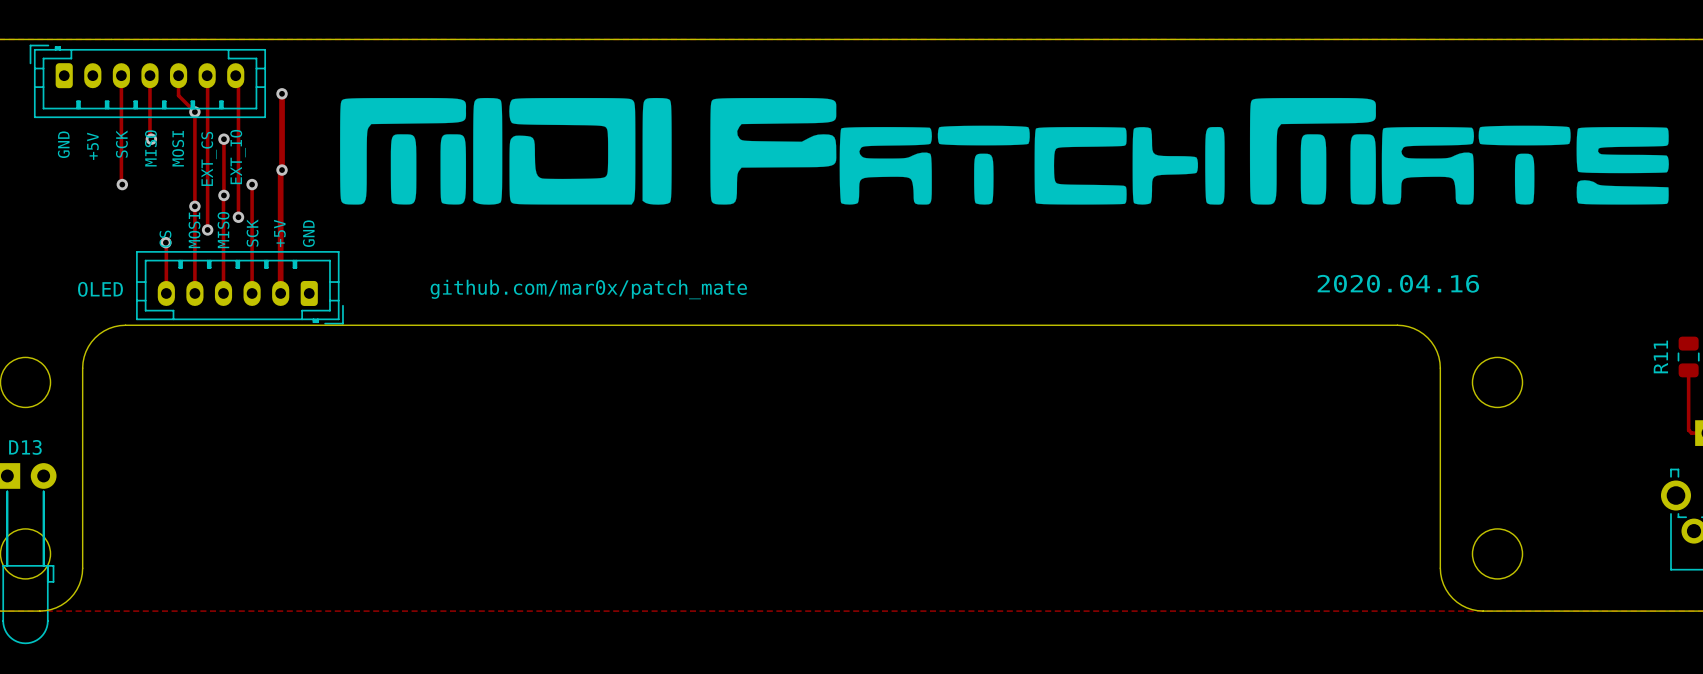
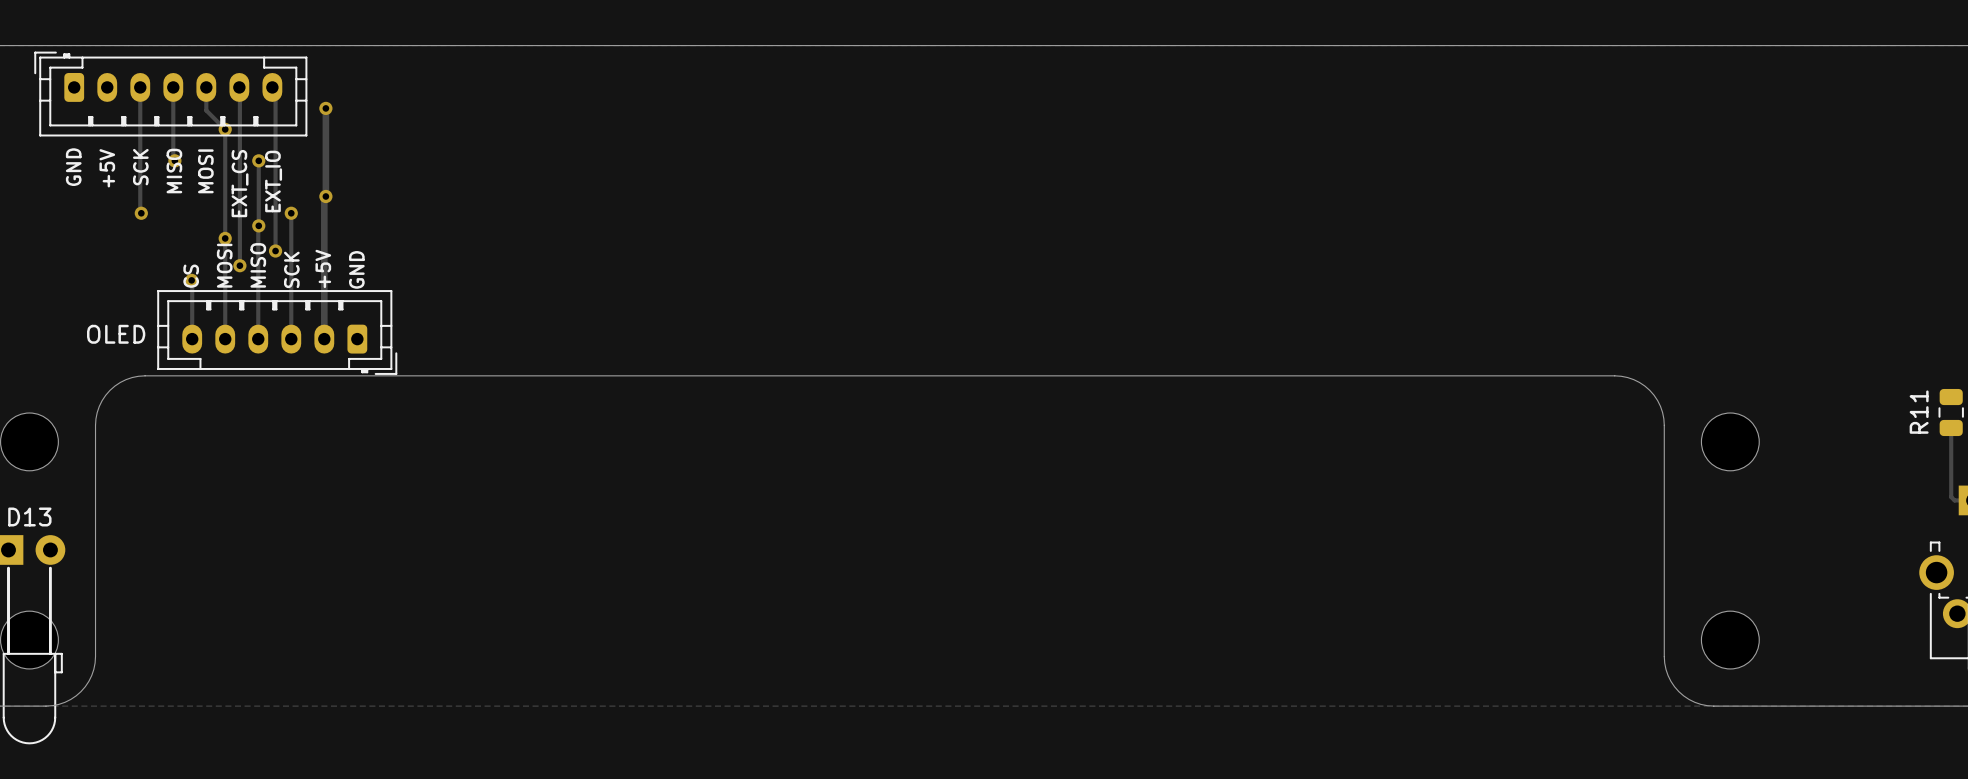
drawing: [340, 97, 1669, 205] -> none
text: 2020.04.16 (1398, 283) -> none
text: github.com/mar0x/patch_mate (588, 289) -> none

